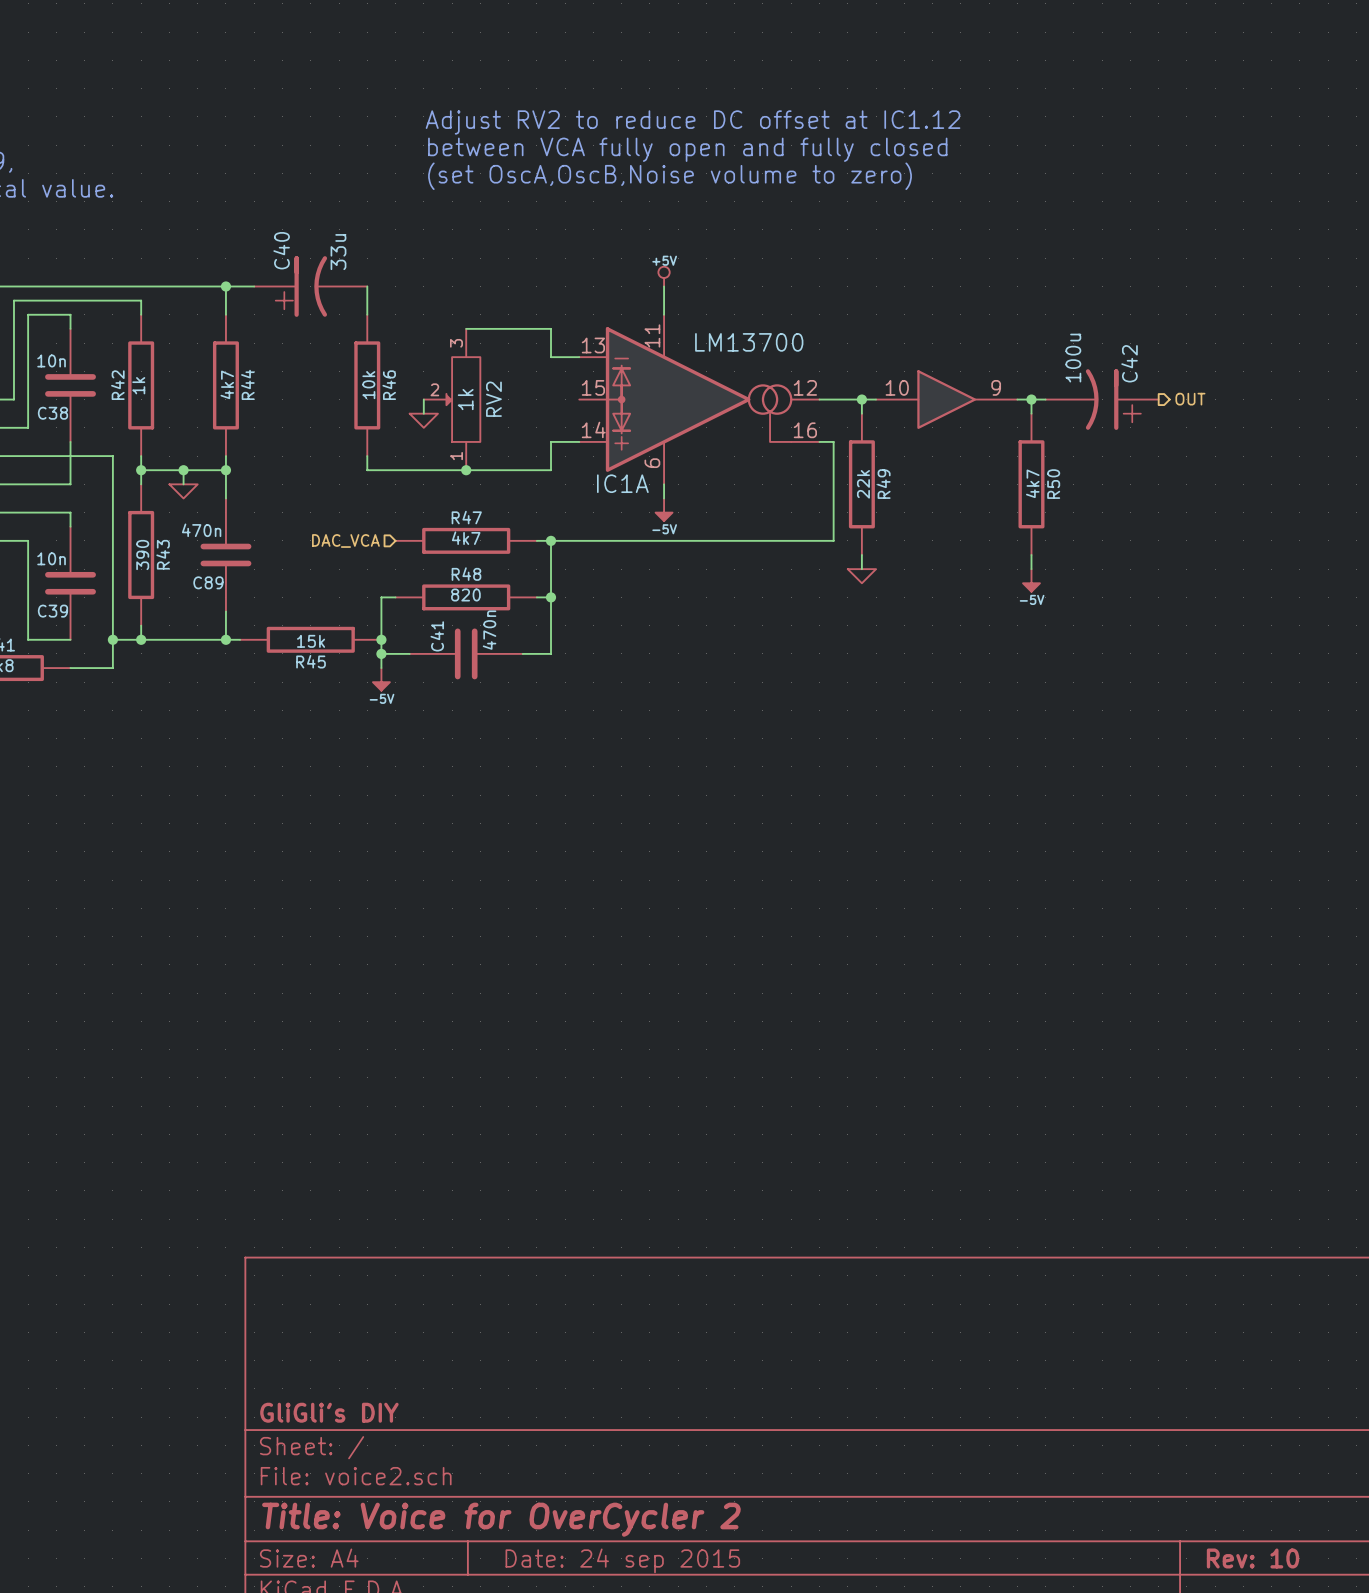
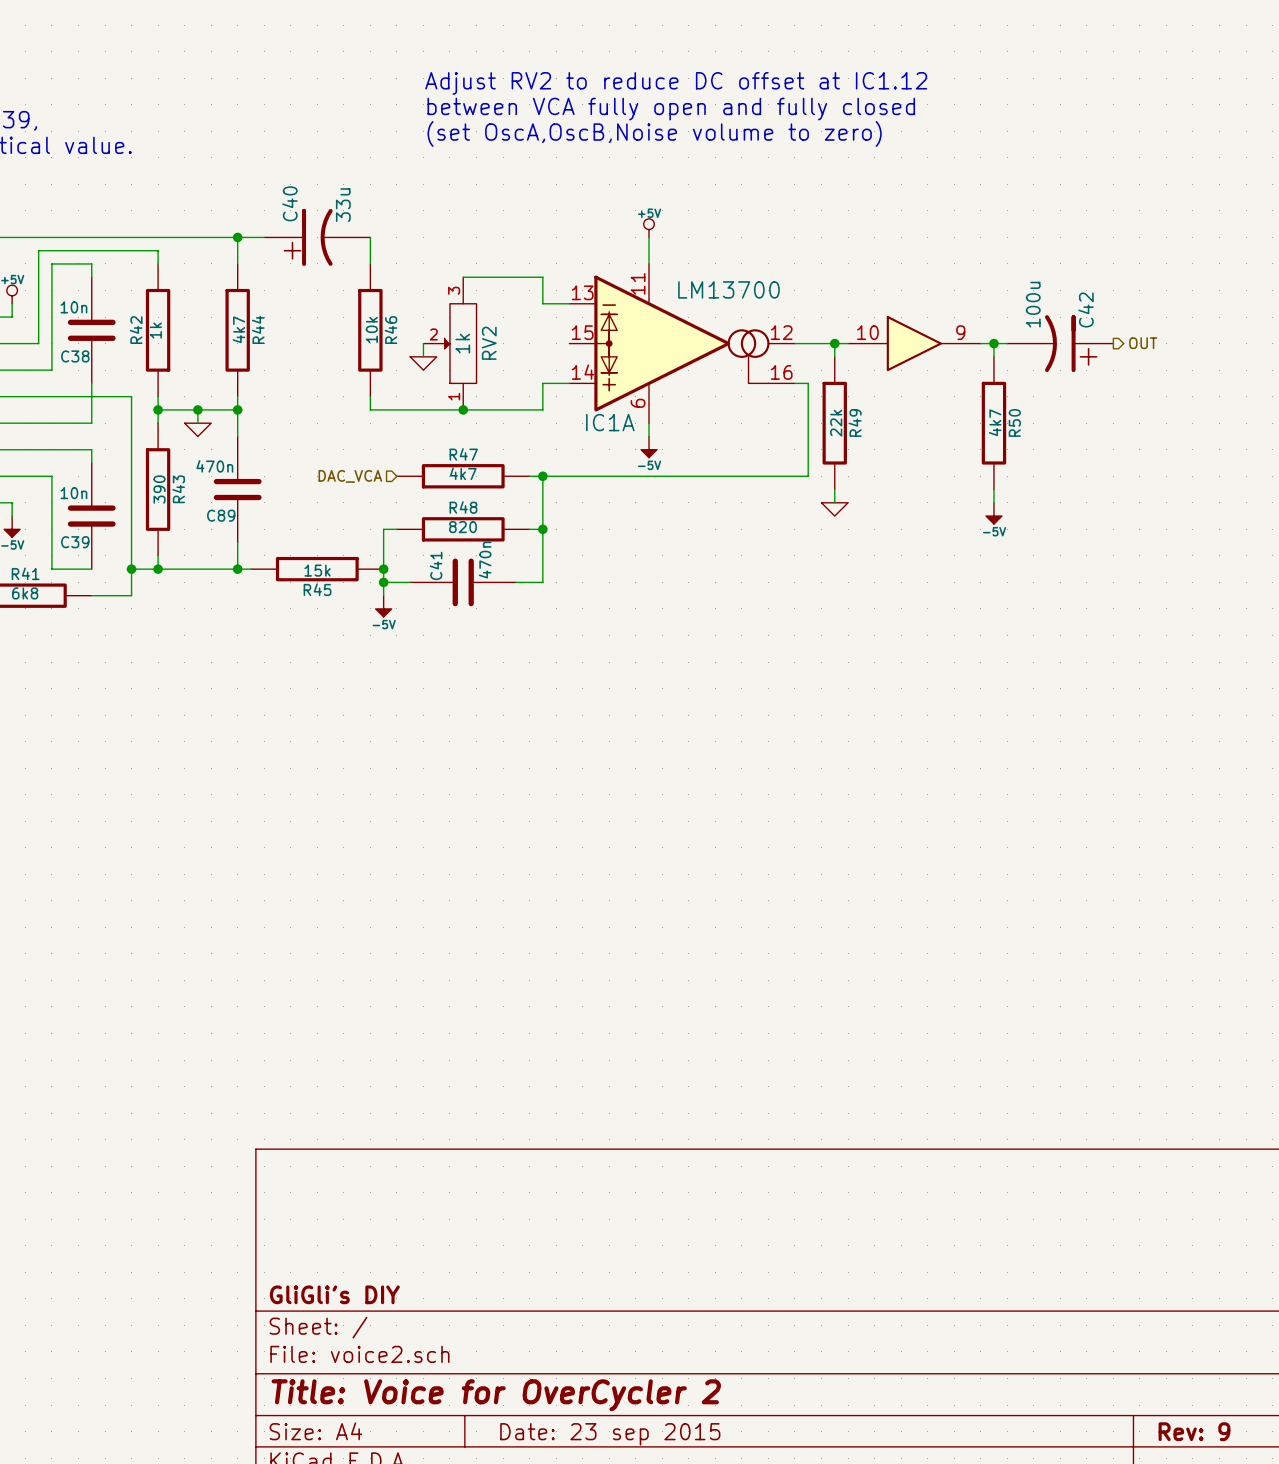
title block: Rev: 10 (1253, 1558) -> Rev: 9 (1194, 1431)
title block: Date: 24 sep 2015 (622, 1560) -> Date: 23 sep 2015 (610, 1434)

